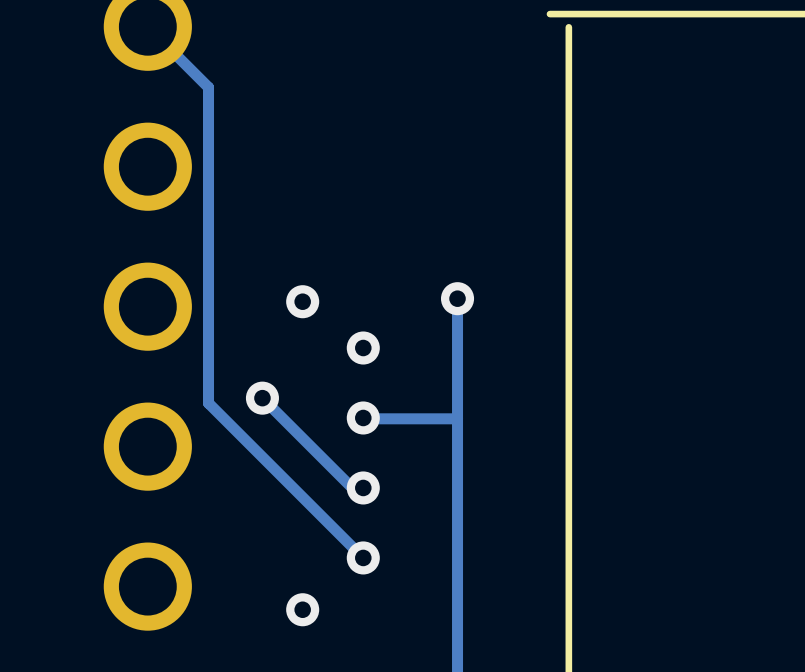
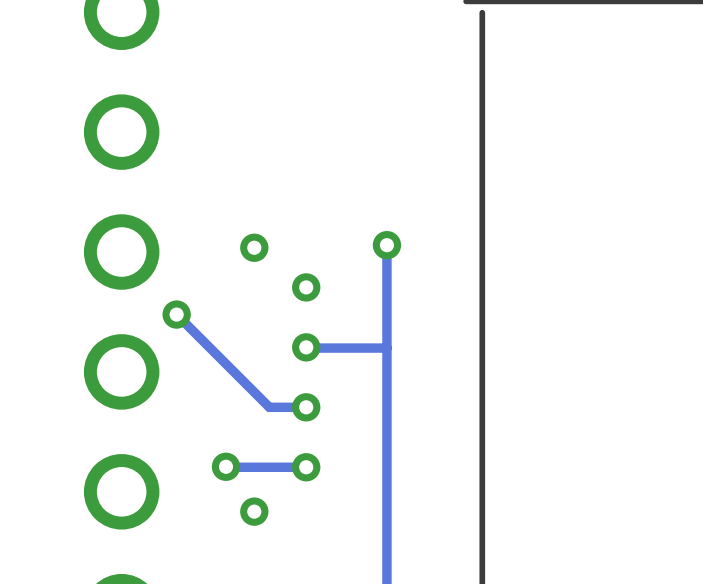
track: (147, 26) (208, 87) (208, 403) (363, 557) -> (226, 467) (306, 467)
track: (262, 398) (352, 487) -> (176, 314) (269, 407) (296, 407)
via position: (262, 398) -> (176, 314)
via: none -> (225, 466)

